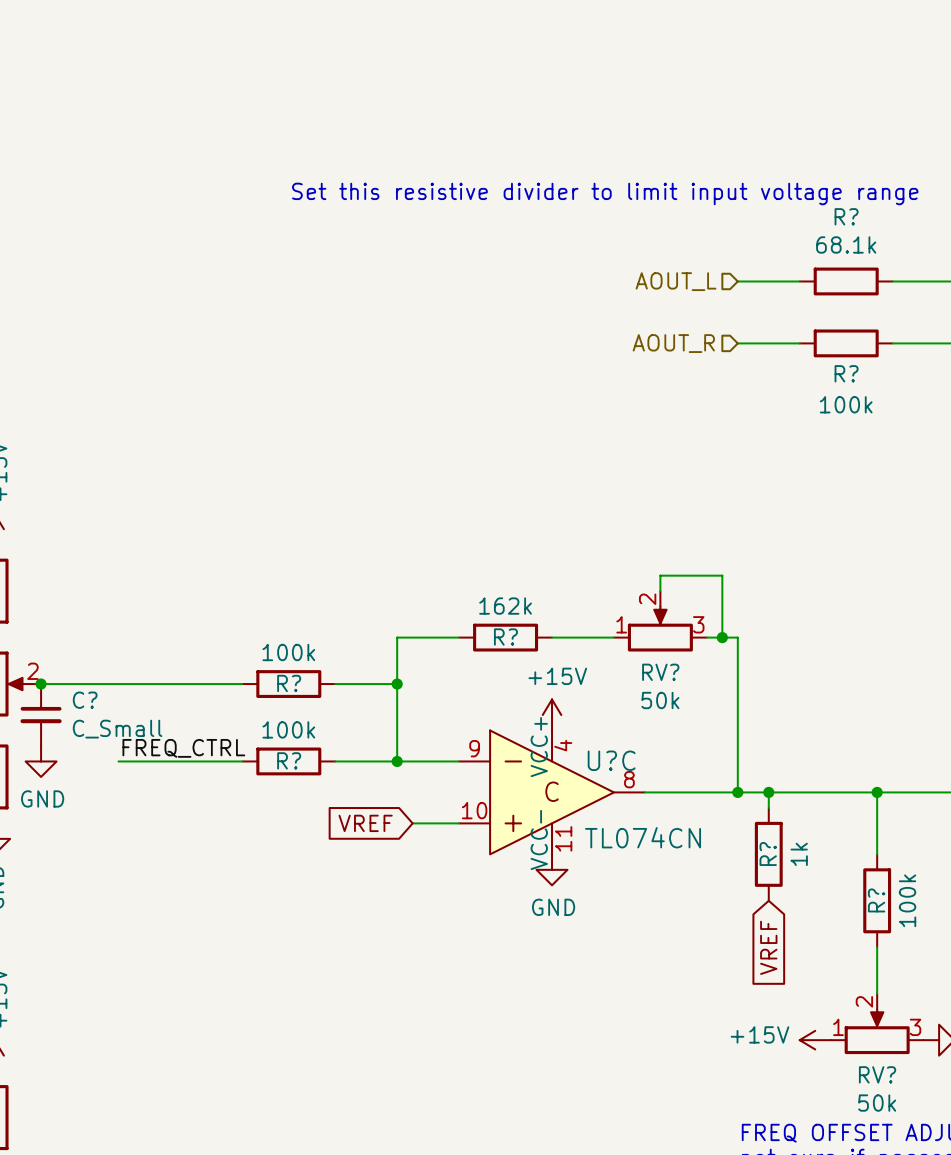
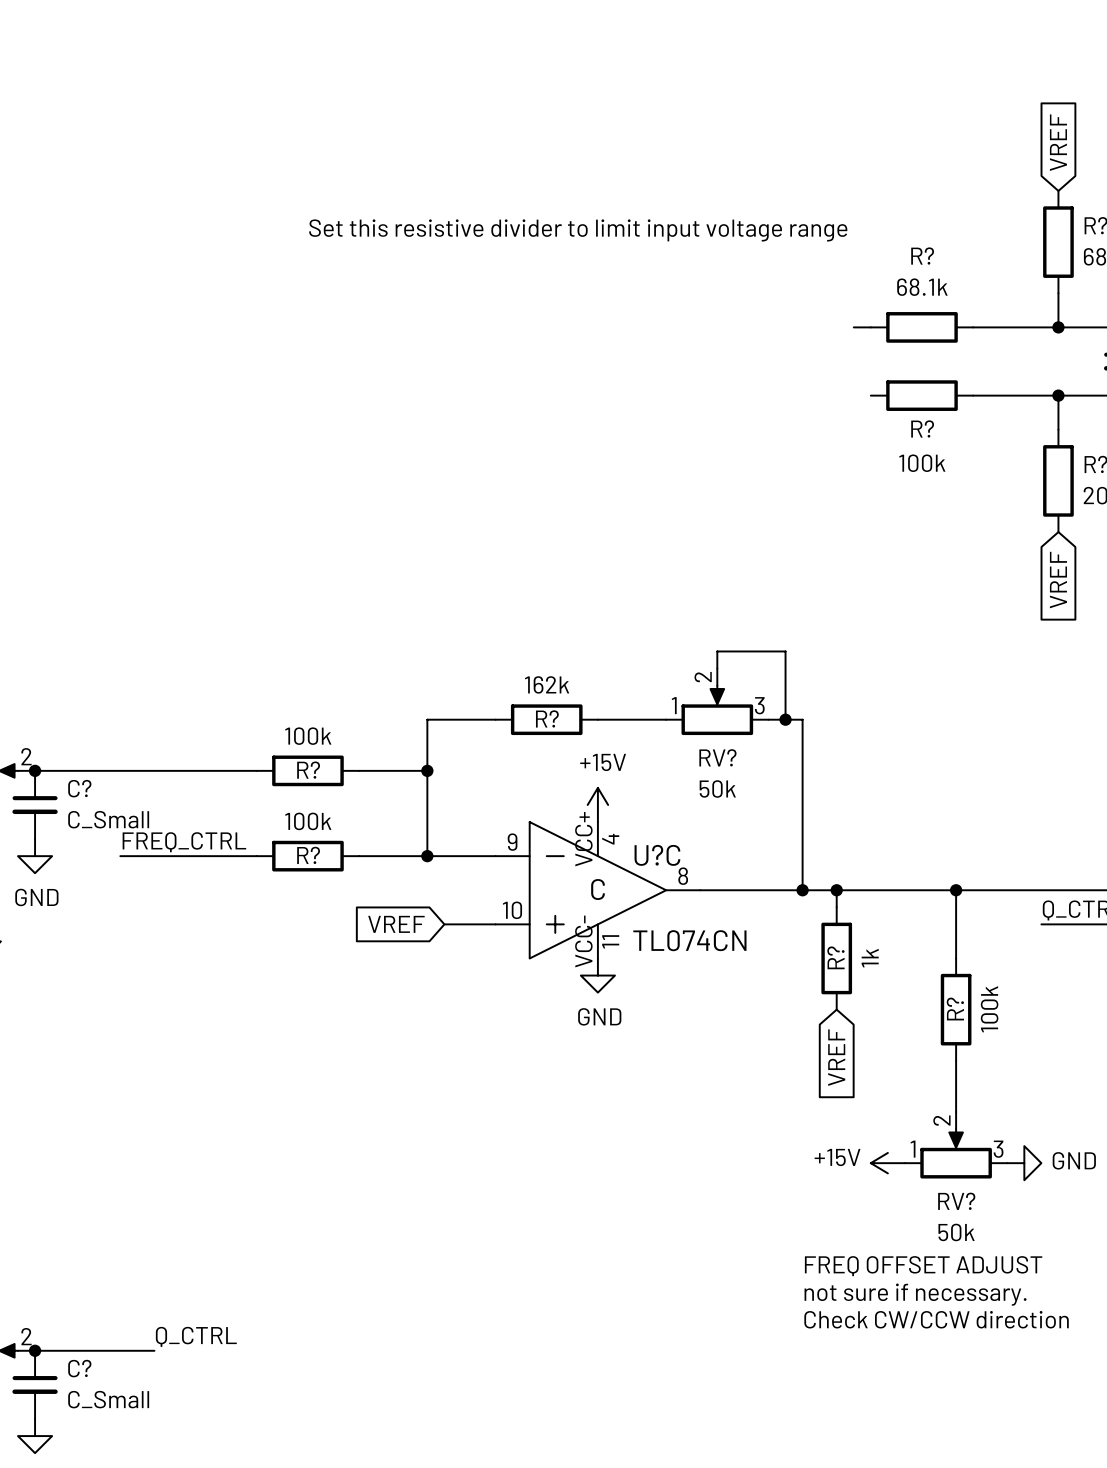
hierarchical label: AOUT_L (676, 281) -> none
wire: (737, 281) (784, 281) -> none
hierarchical label: AOUT_R (673, 343) -> none
wire: (737, 343) (799, 343) -> none

